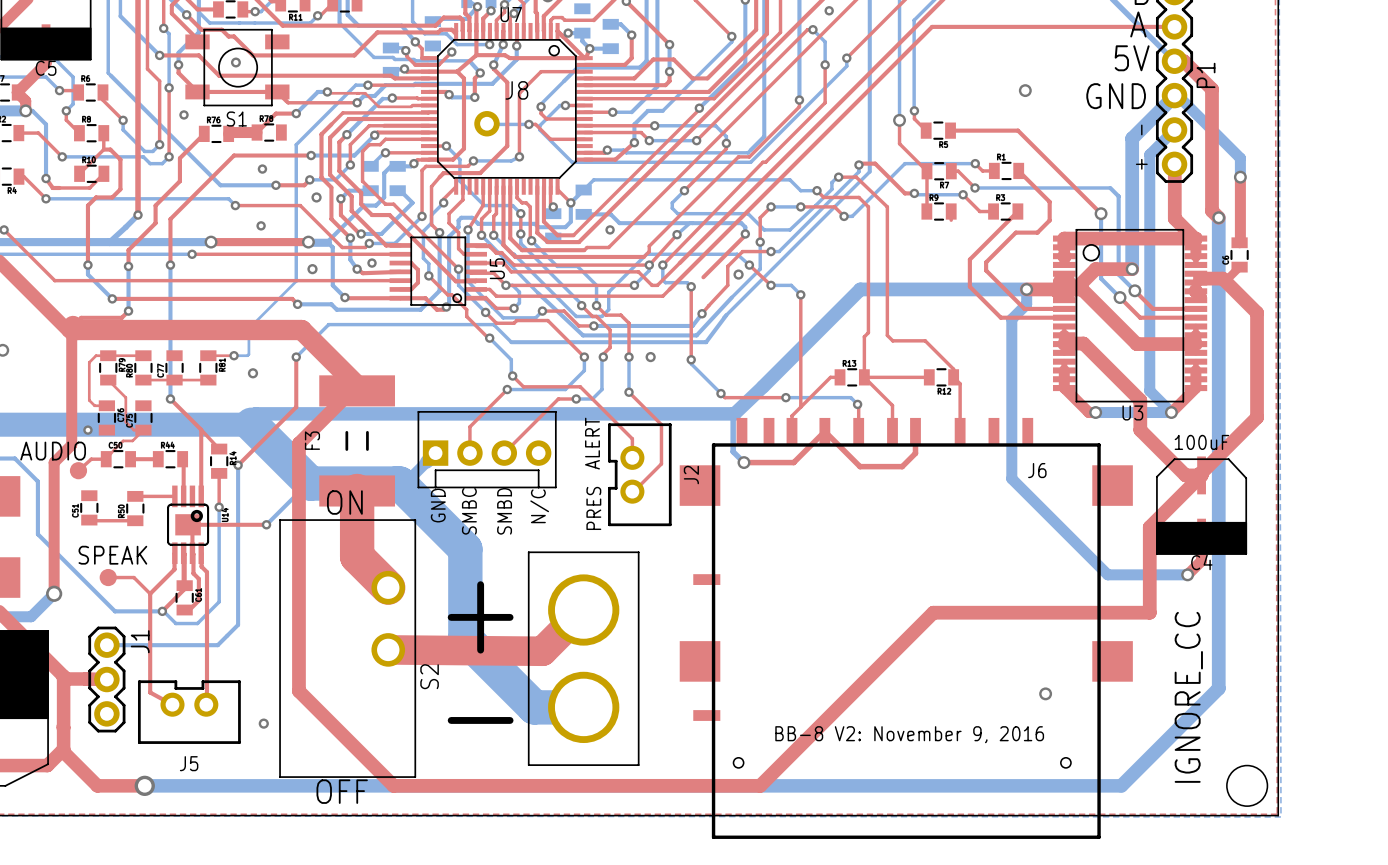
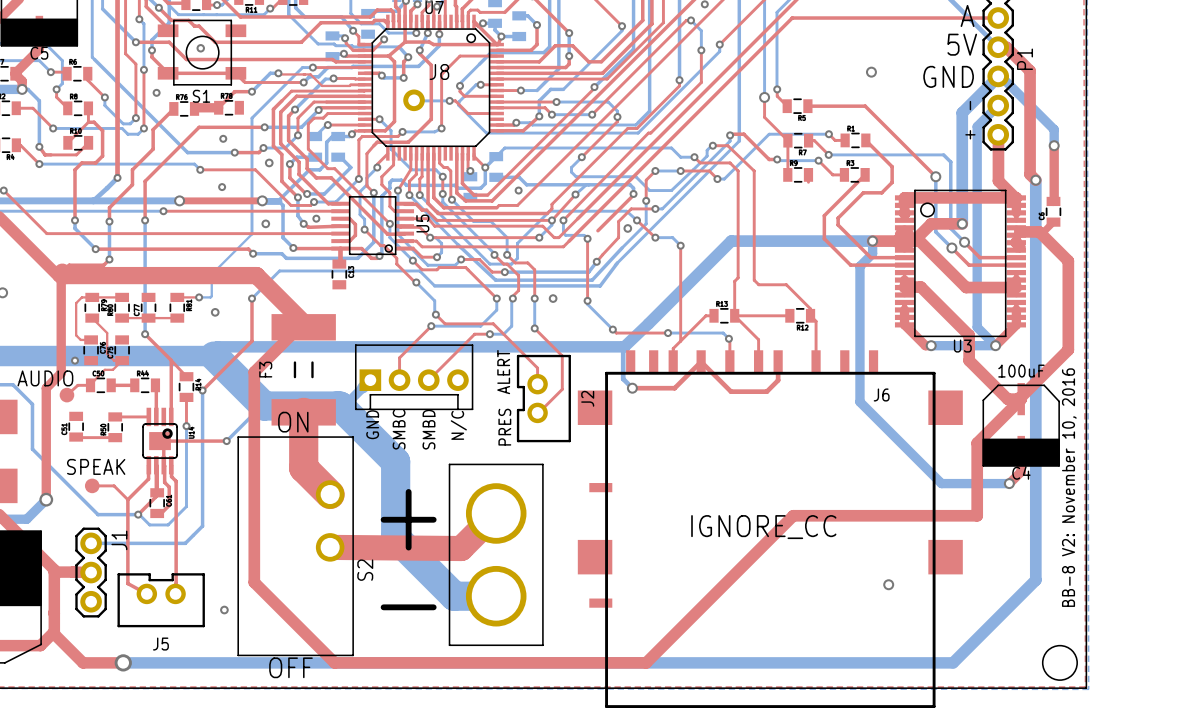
top track: none -> (340, 248) (339, 264)
part: none -> (339, 274)
J6 footprint: [679, 417, 1133, 839] -> [577, 350, 963, 708]
text: none -> BB-8 V2: November 10, 2016 (1069, 487)
text: none -> IGNORE_CC (763, 527)
text: IGNORE_CC (1188, 697) -> none
text: BB-8 V2: November 9, 2016 (909, 734) -> none

